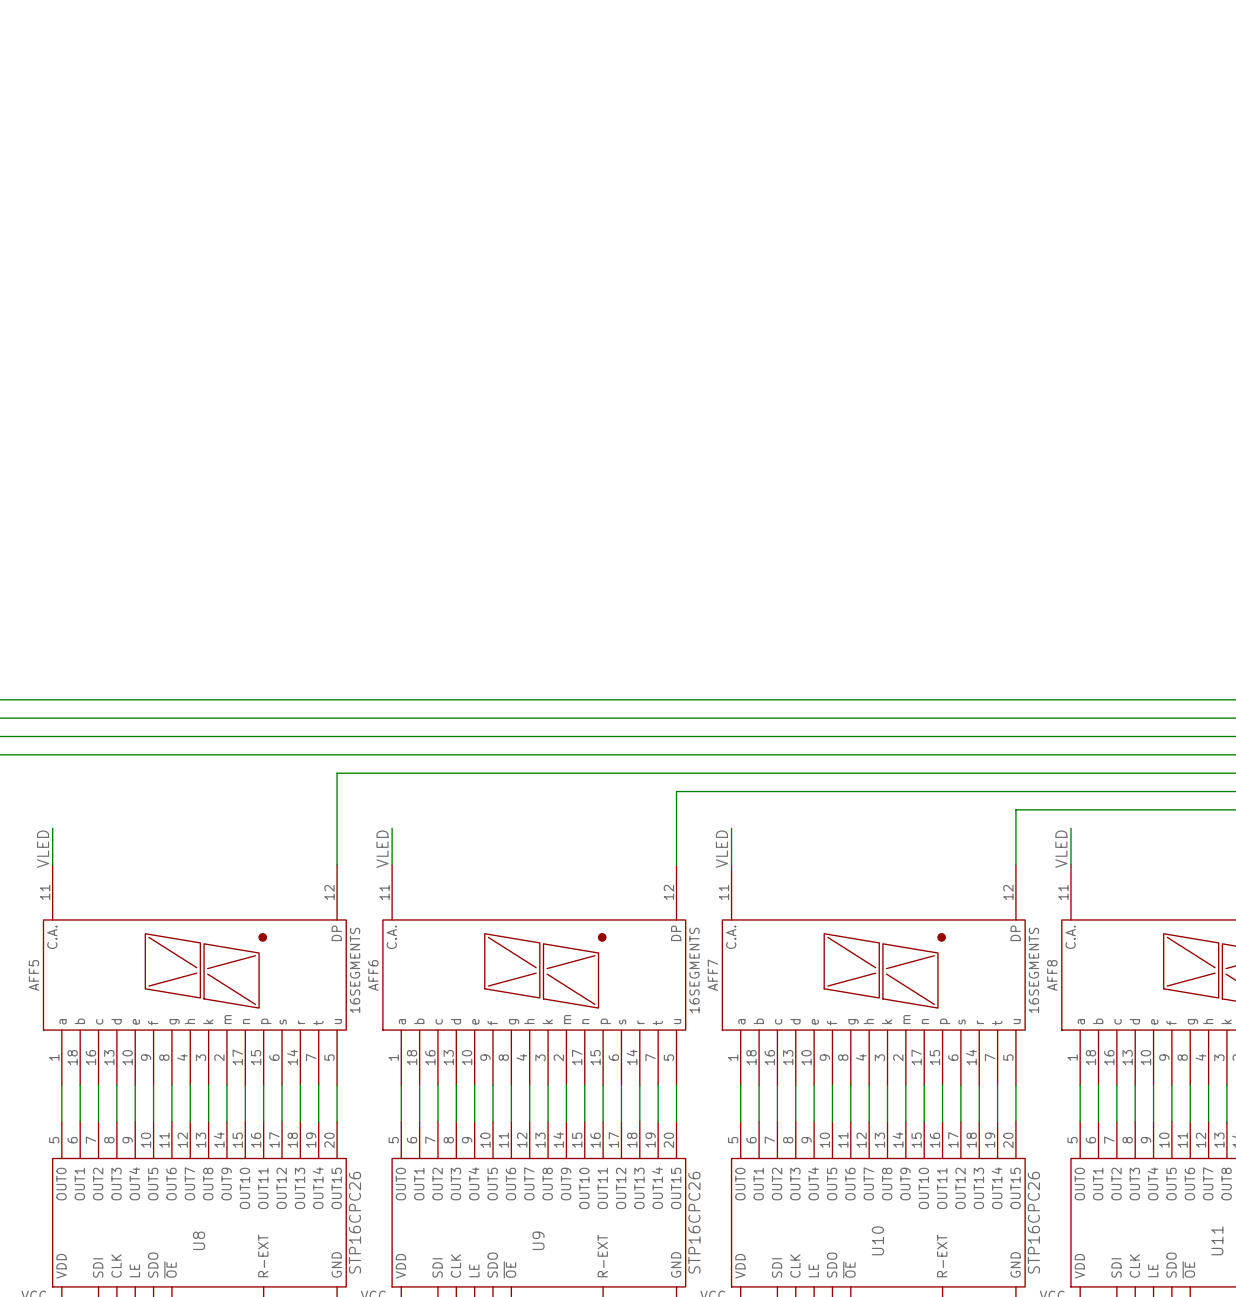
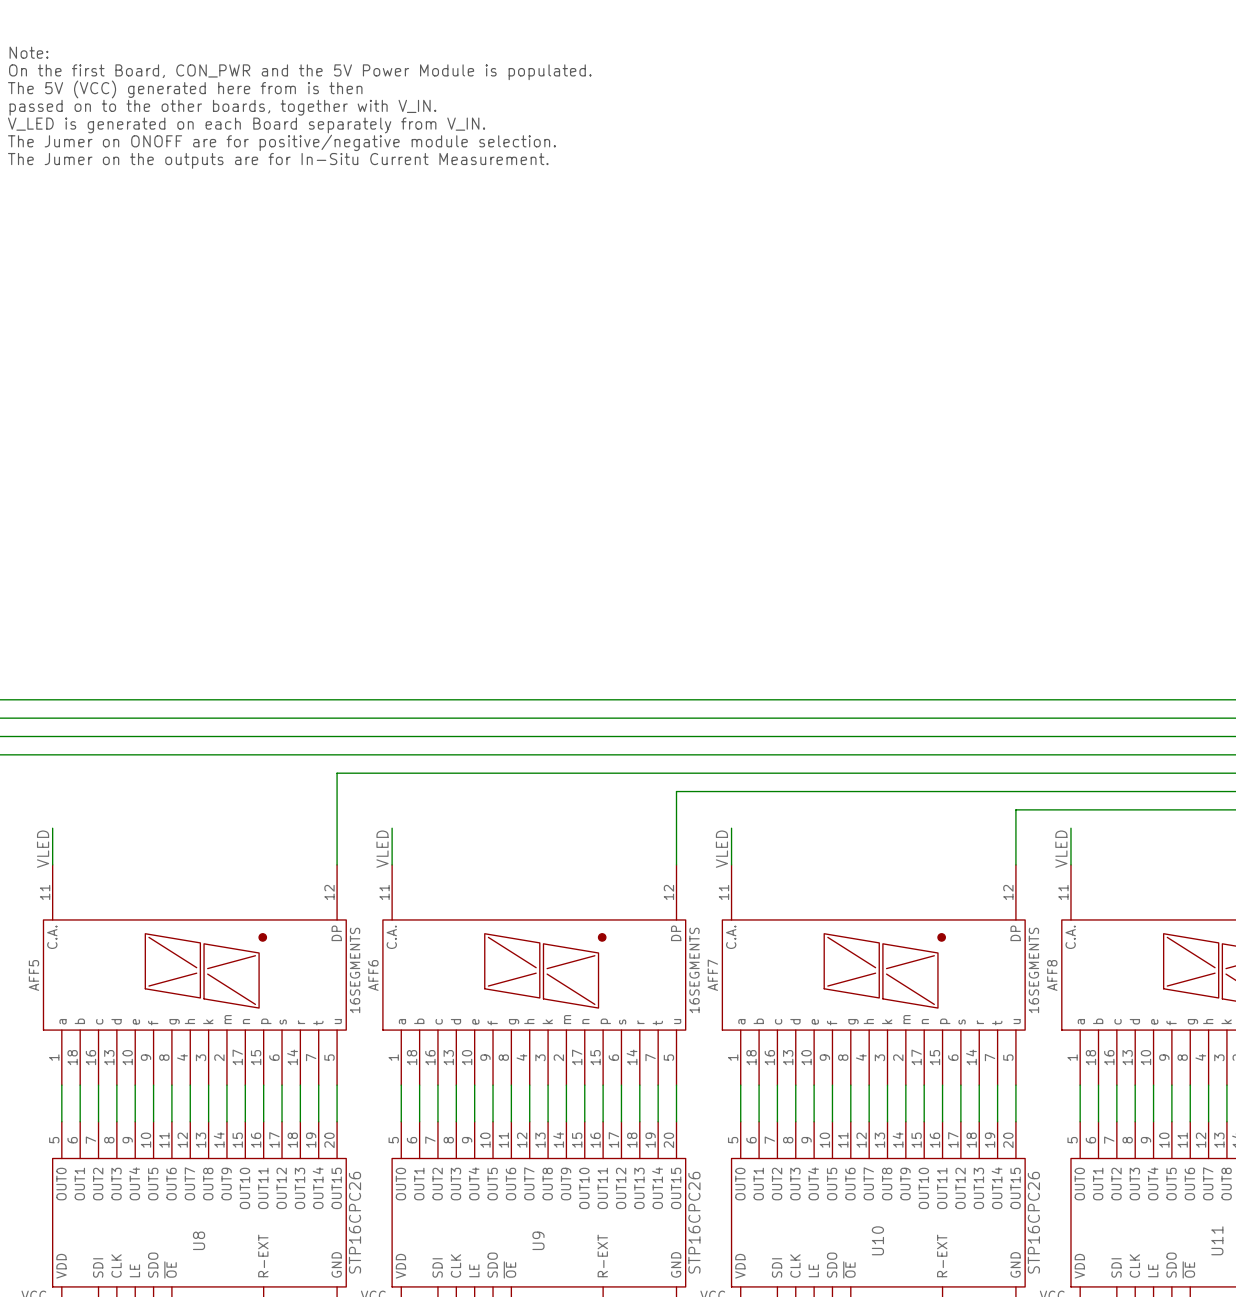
text: none -> Note: (29, 52)
text: none -> On the first Board, CON_PWR and the 5V Power Module is populated. (300, 72)
text: none -> The 5V (VCC) generated here from is then (185, 89)
text: none -> passed on to the other boards, together with V_IN. (222, 107)
text: none -> V_LED is generated on each Board separately from V_IN. (246, 125)
text: none -> The Jumer on ONOFF are for positive/negative module selection. (281, 142)
text: none -> The Jumer on the outputs are for In-Situ Current Measurement. (278, 160)

